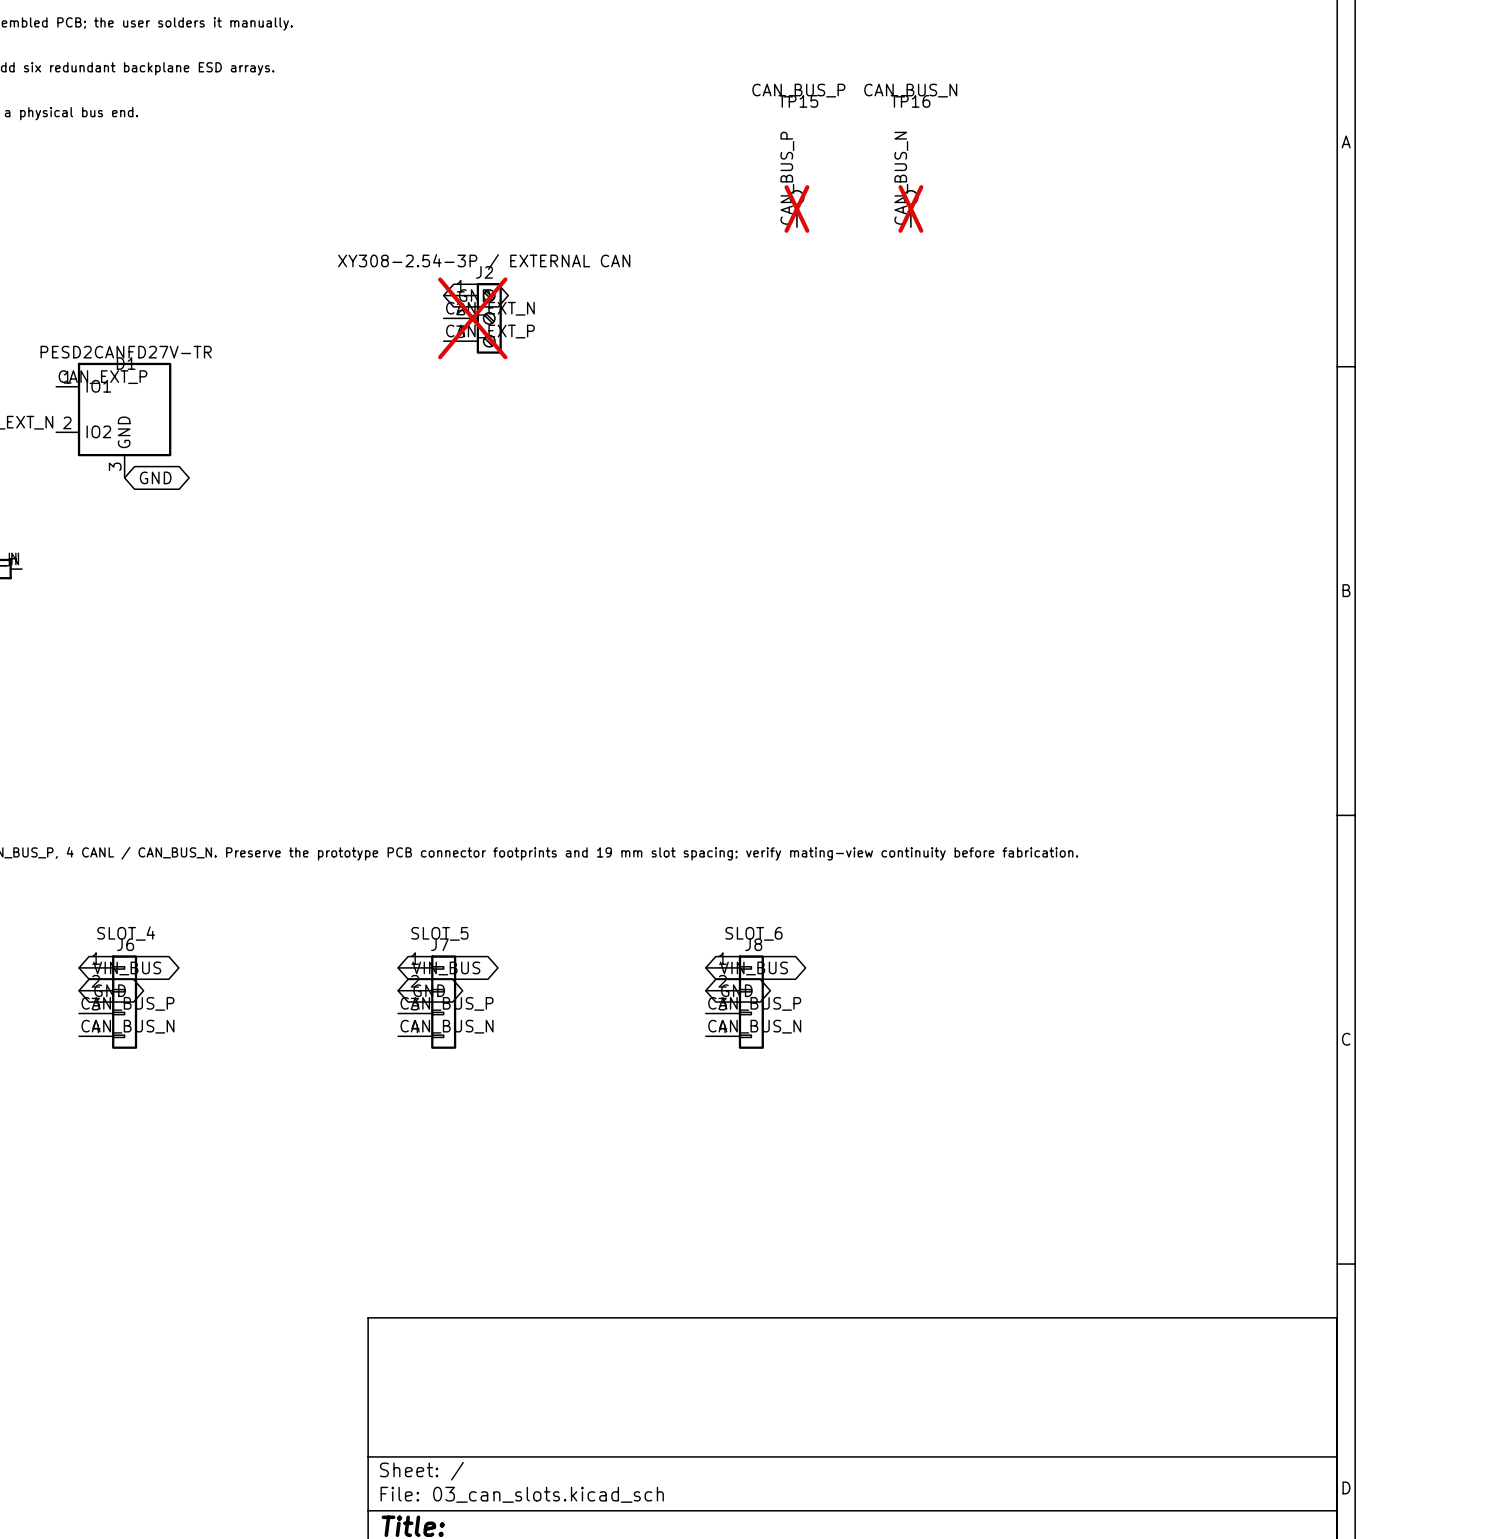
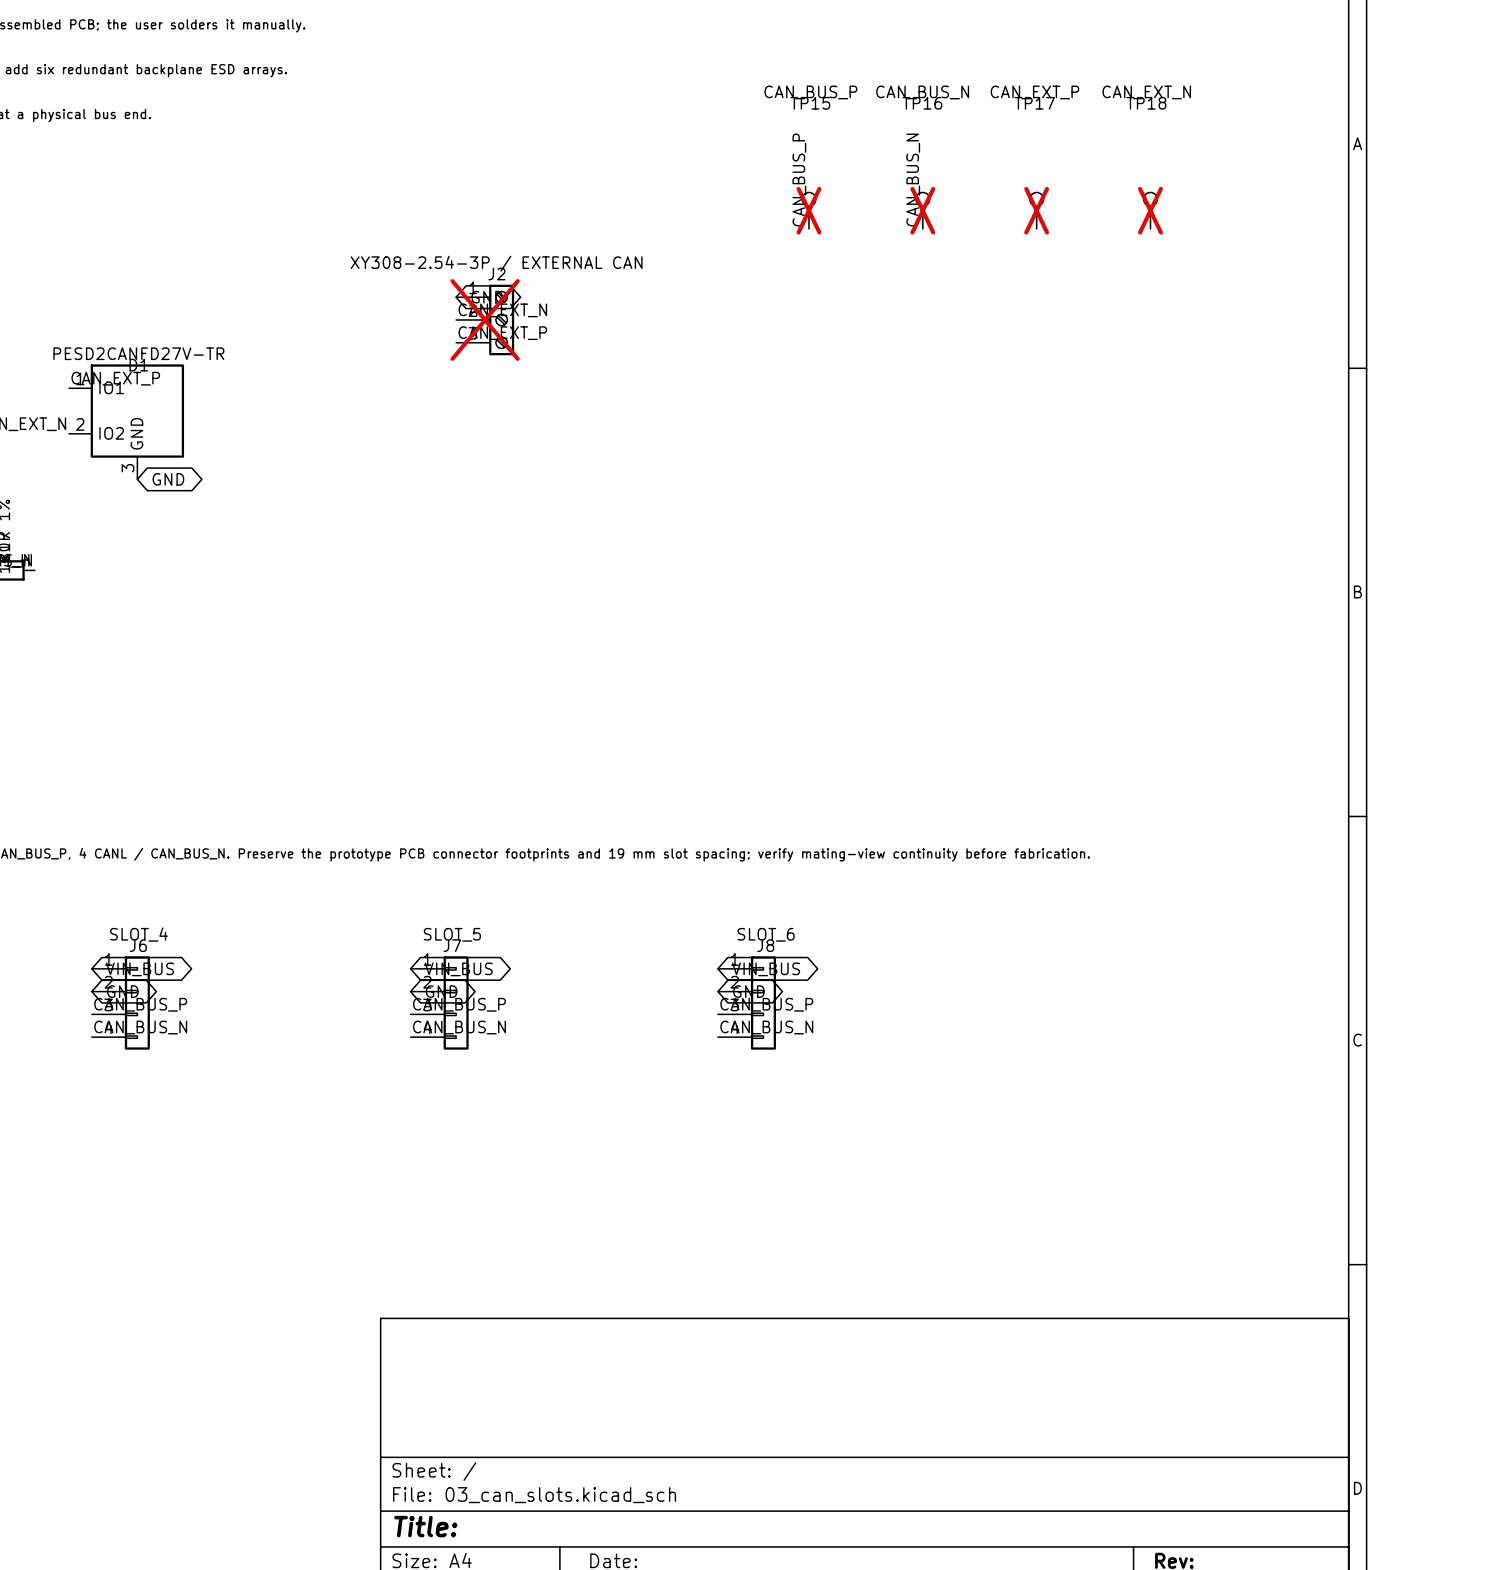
TP17: none -> CAN_EXT_P (1036, 210)
TP18: none -> CAN_EXT_N (1150, 210)

